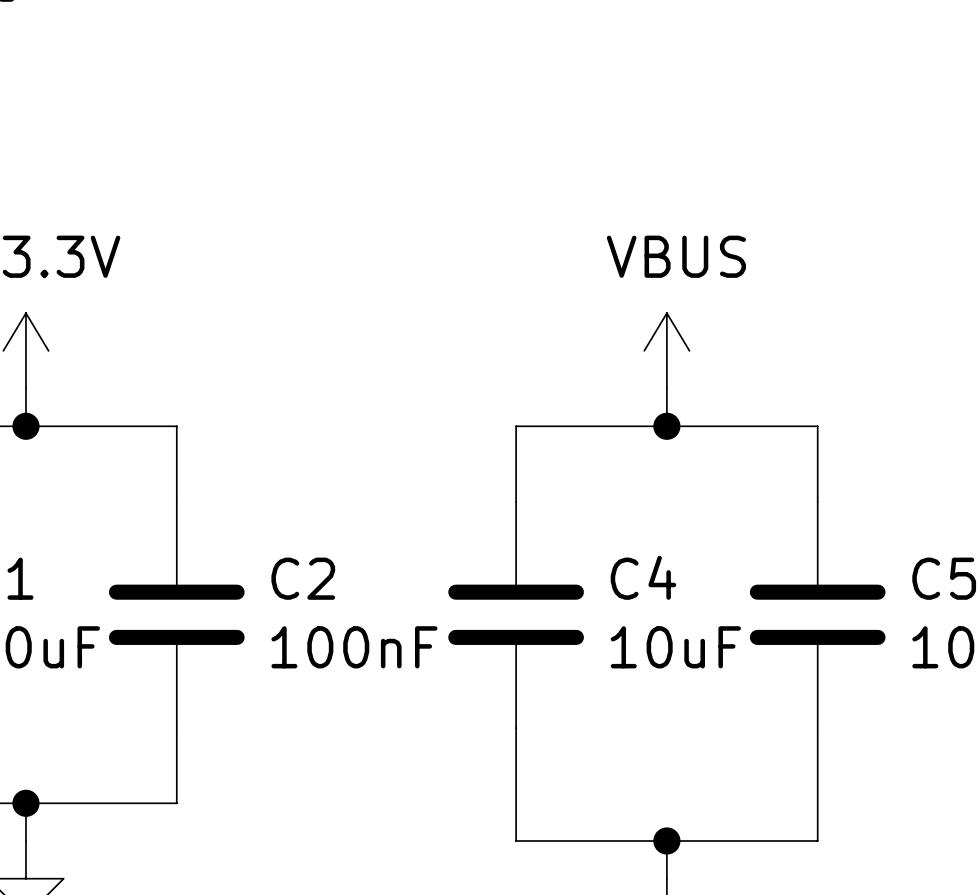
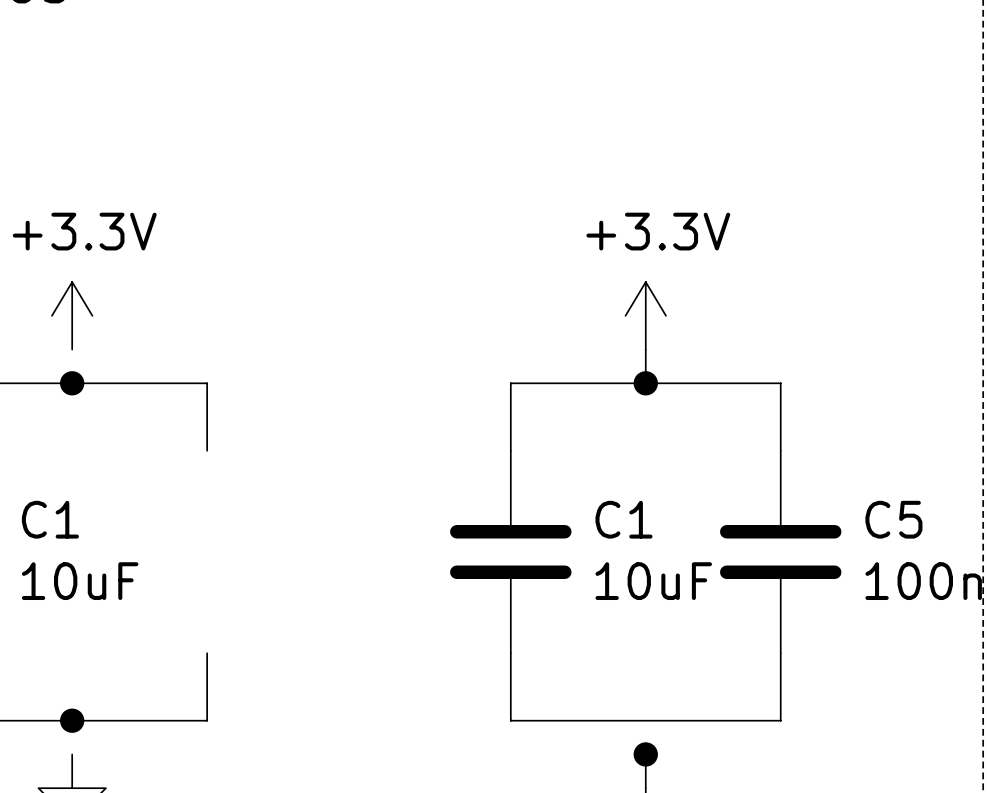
power symbol: VBUS (666, 350) -> +3.3V (645, 315)
wire: (25, 388) (25, 426) -> none
C4 name: C4 (643, 577) -> C1 (624, 519)
C2: 100nF (176, 614) -> none
wire: (25, 803) (25, 841) -> none
wire: (516, 803) (516, 841) (817, 841) (817, 803) -> (510, 720) (780, 720)

